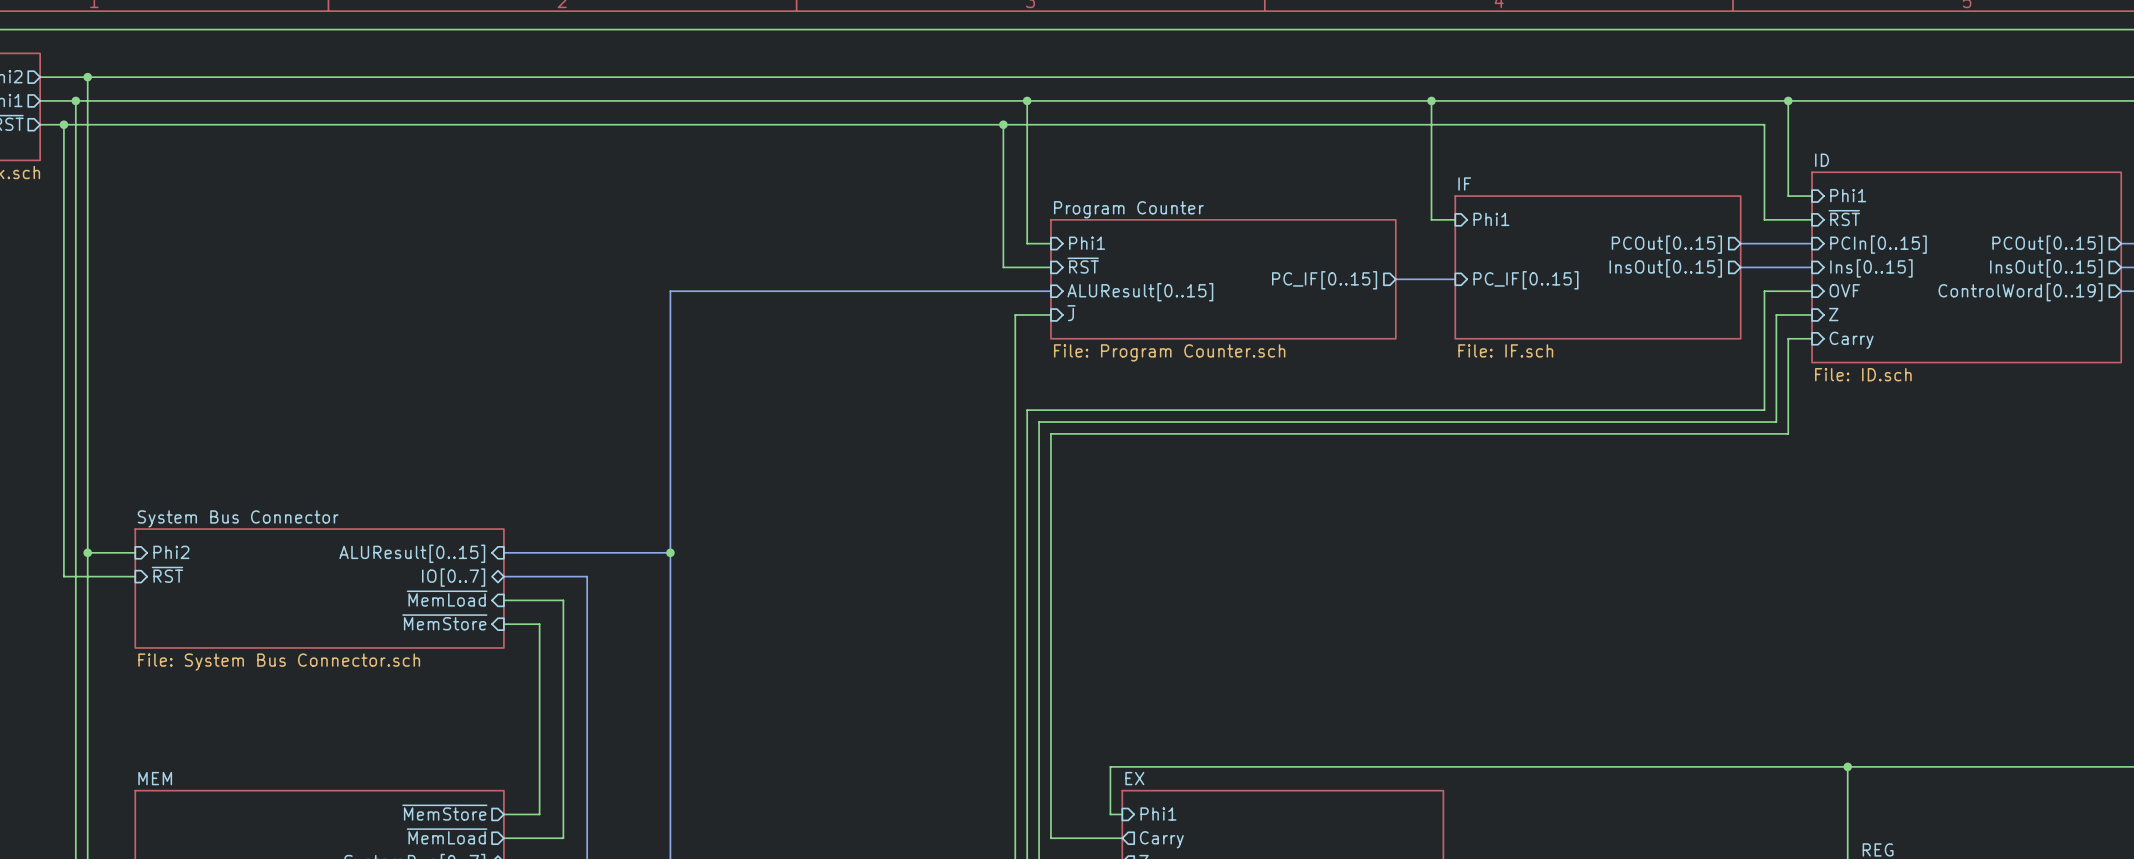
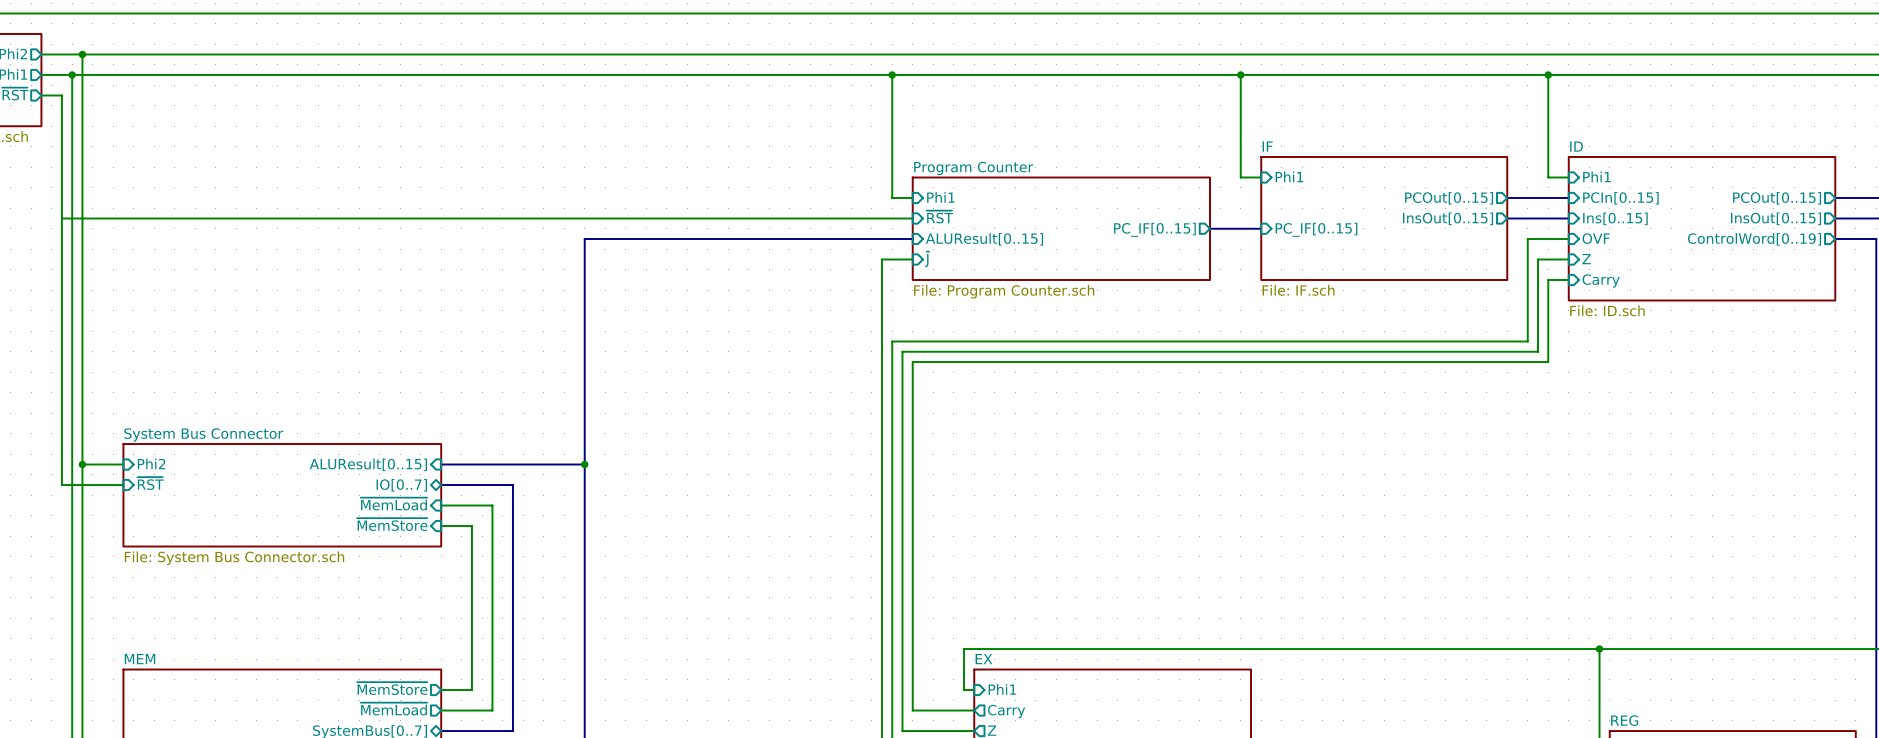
wire: (63, 124) (1764, 124) (1764, 219) (1788, 219) -> none
junction: (63, 124) -> none
wire: (1003, 124) (1003, 267) -> (61, 218) (871, 218)
junction: (1003, 124) -> none
sheet pin: Phi1 (1848, 195) -> none
wire: (1788, 196) (1812, 196) -> (1548, 156) (1548, 177)
sheet pin: ~{RST} (1844, 218) -> Phi1 (1596, 176)
sheet ID: File: ID.sch (1966, 267) -> none
sheet ID: none -> File: ID.sch (1702, 228)

